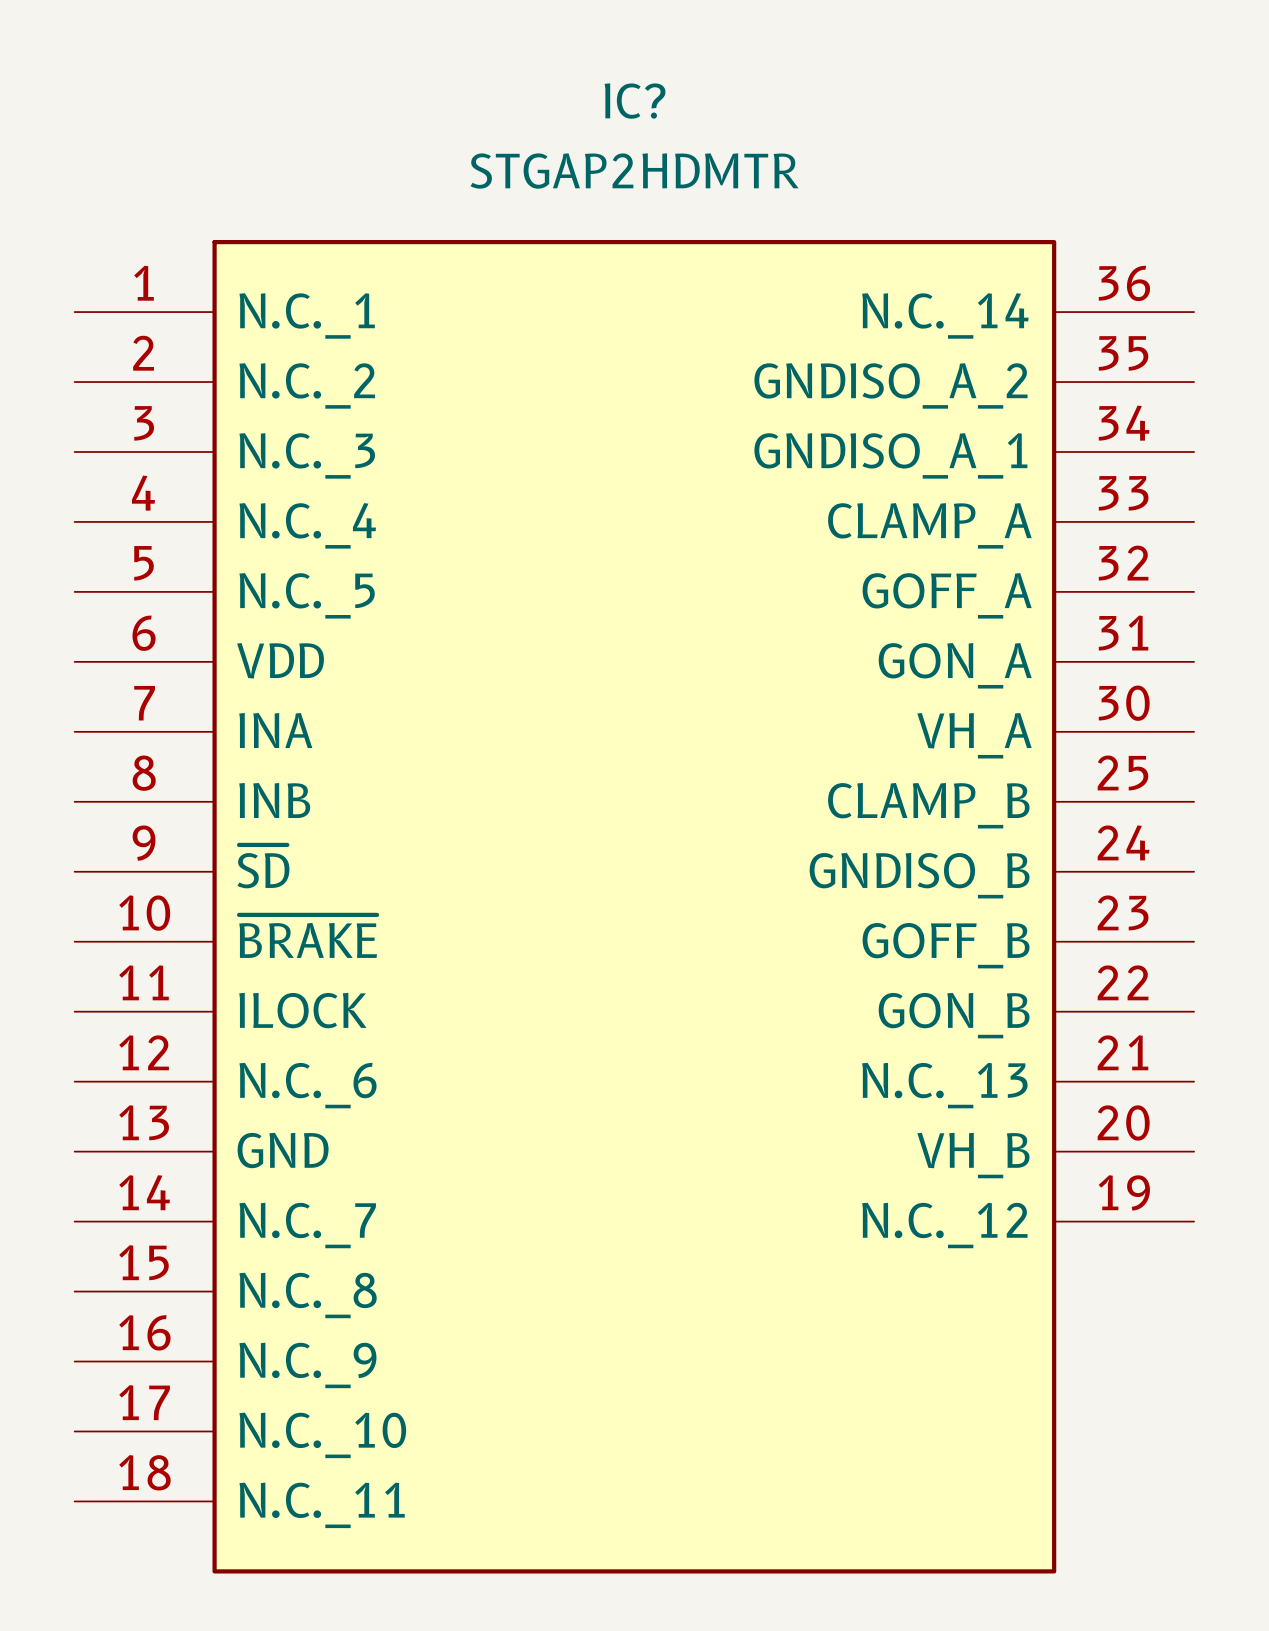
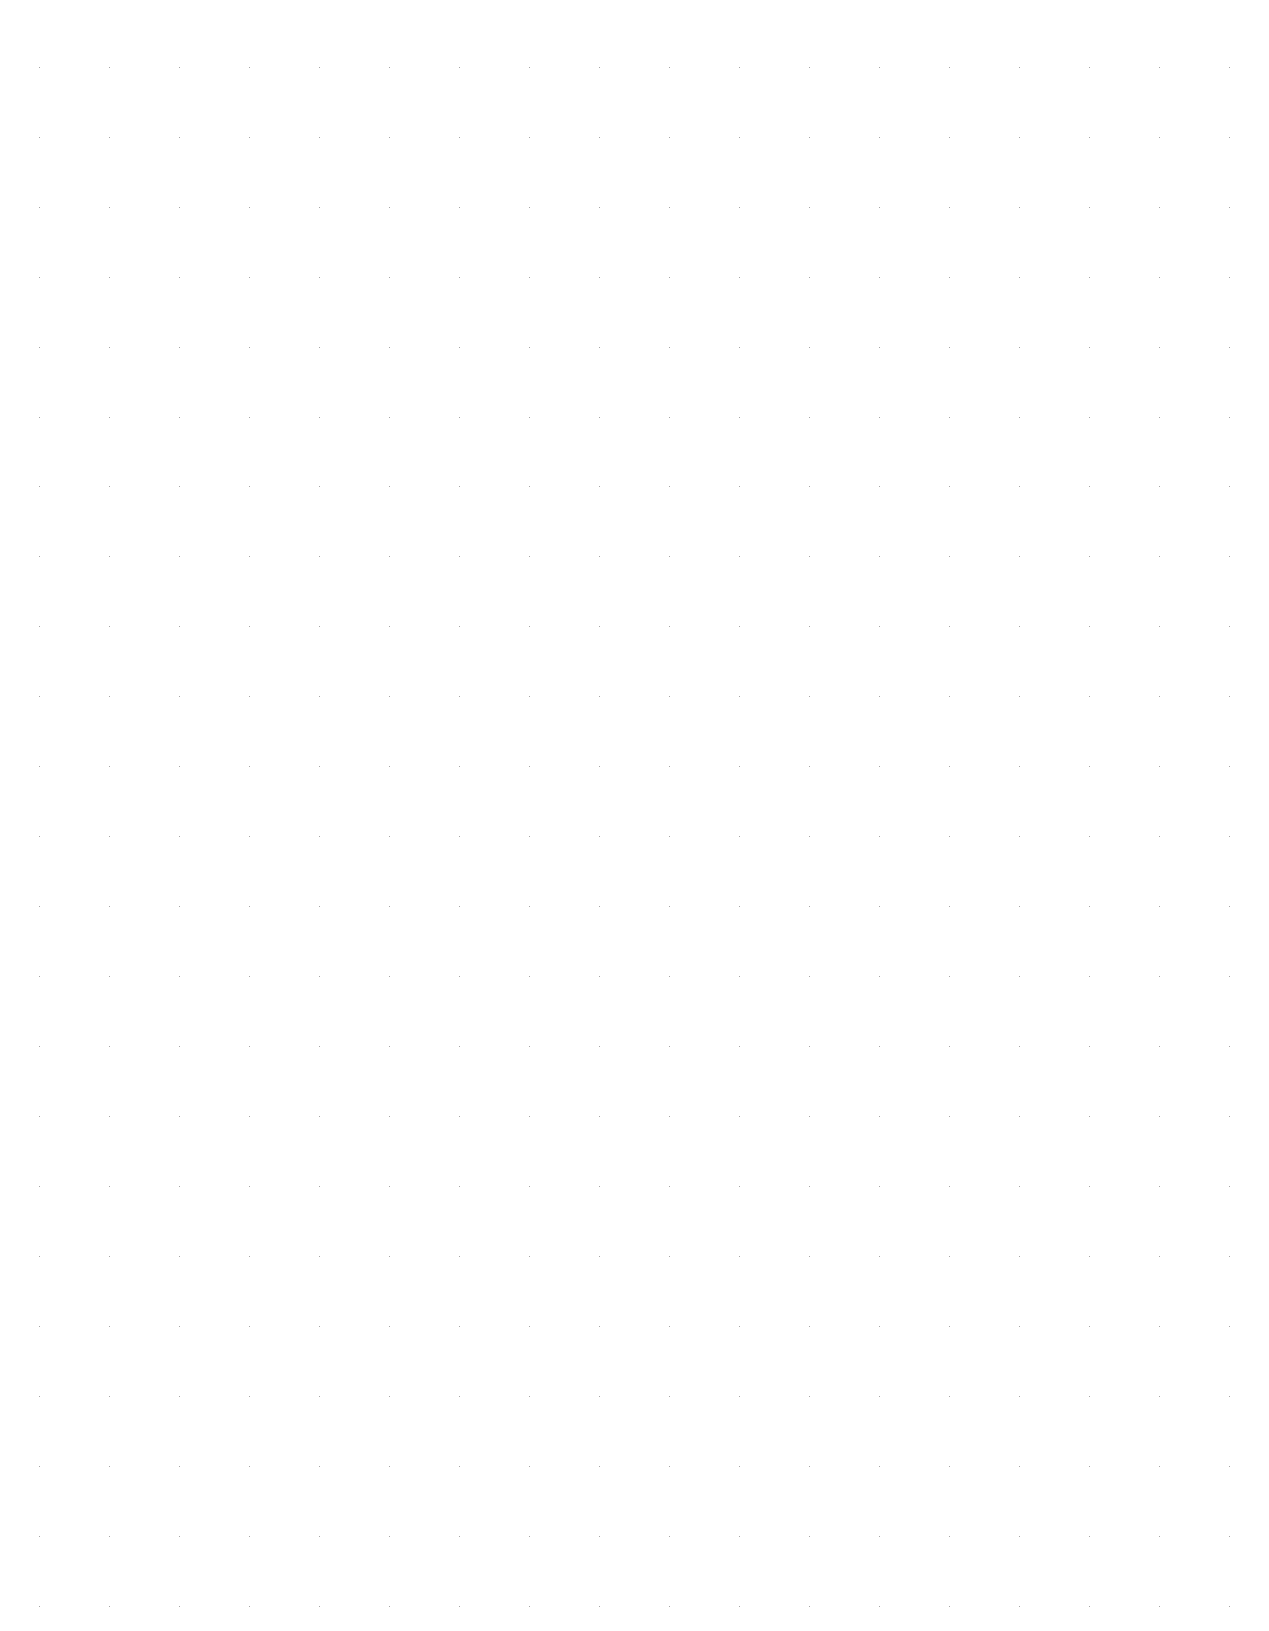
IC?: STGAP2HDMTR (634, 906) -> none

